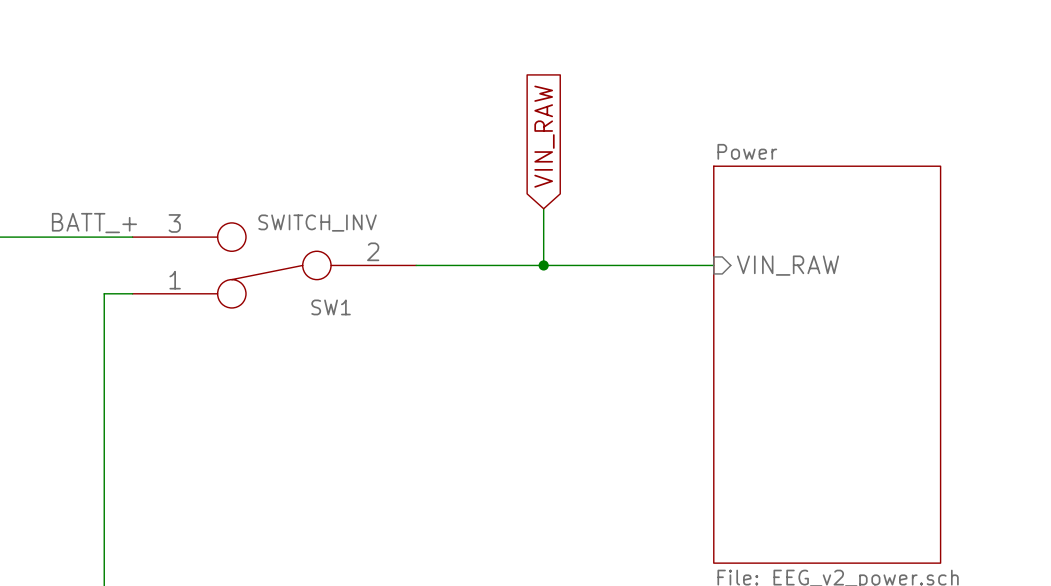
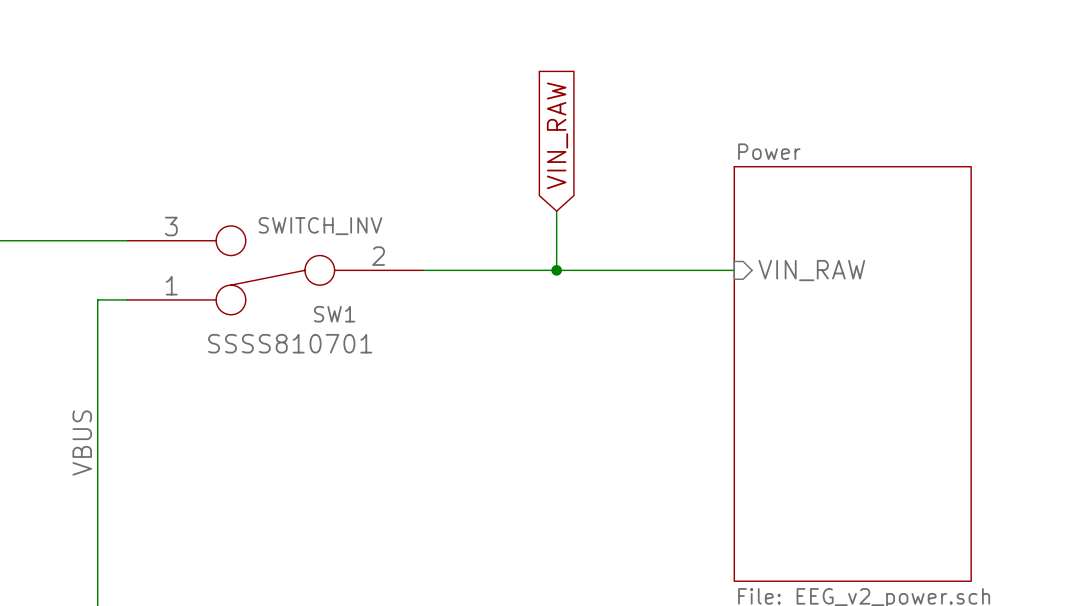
label: BATT_+ (94, 223) -> none
SW1 text: none -> SSSS810701 (290, 343)
label: none -> VBUS (82, 443)

